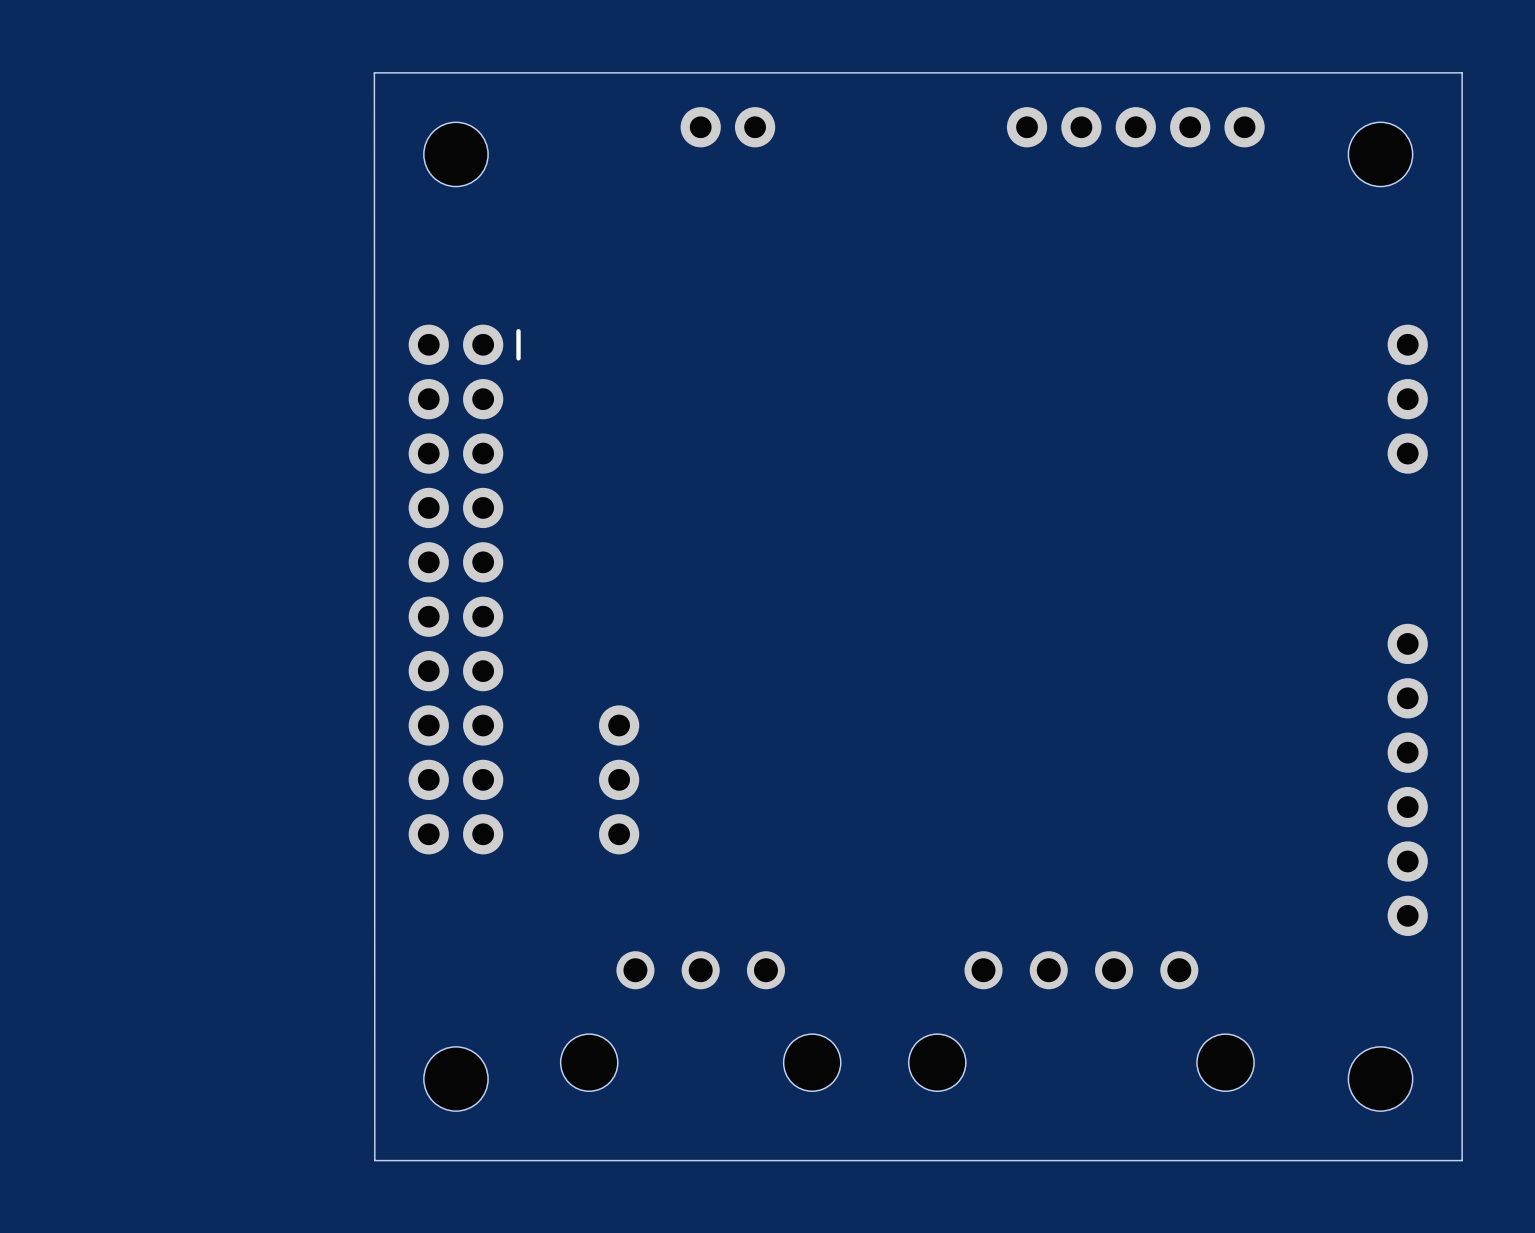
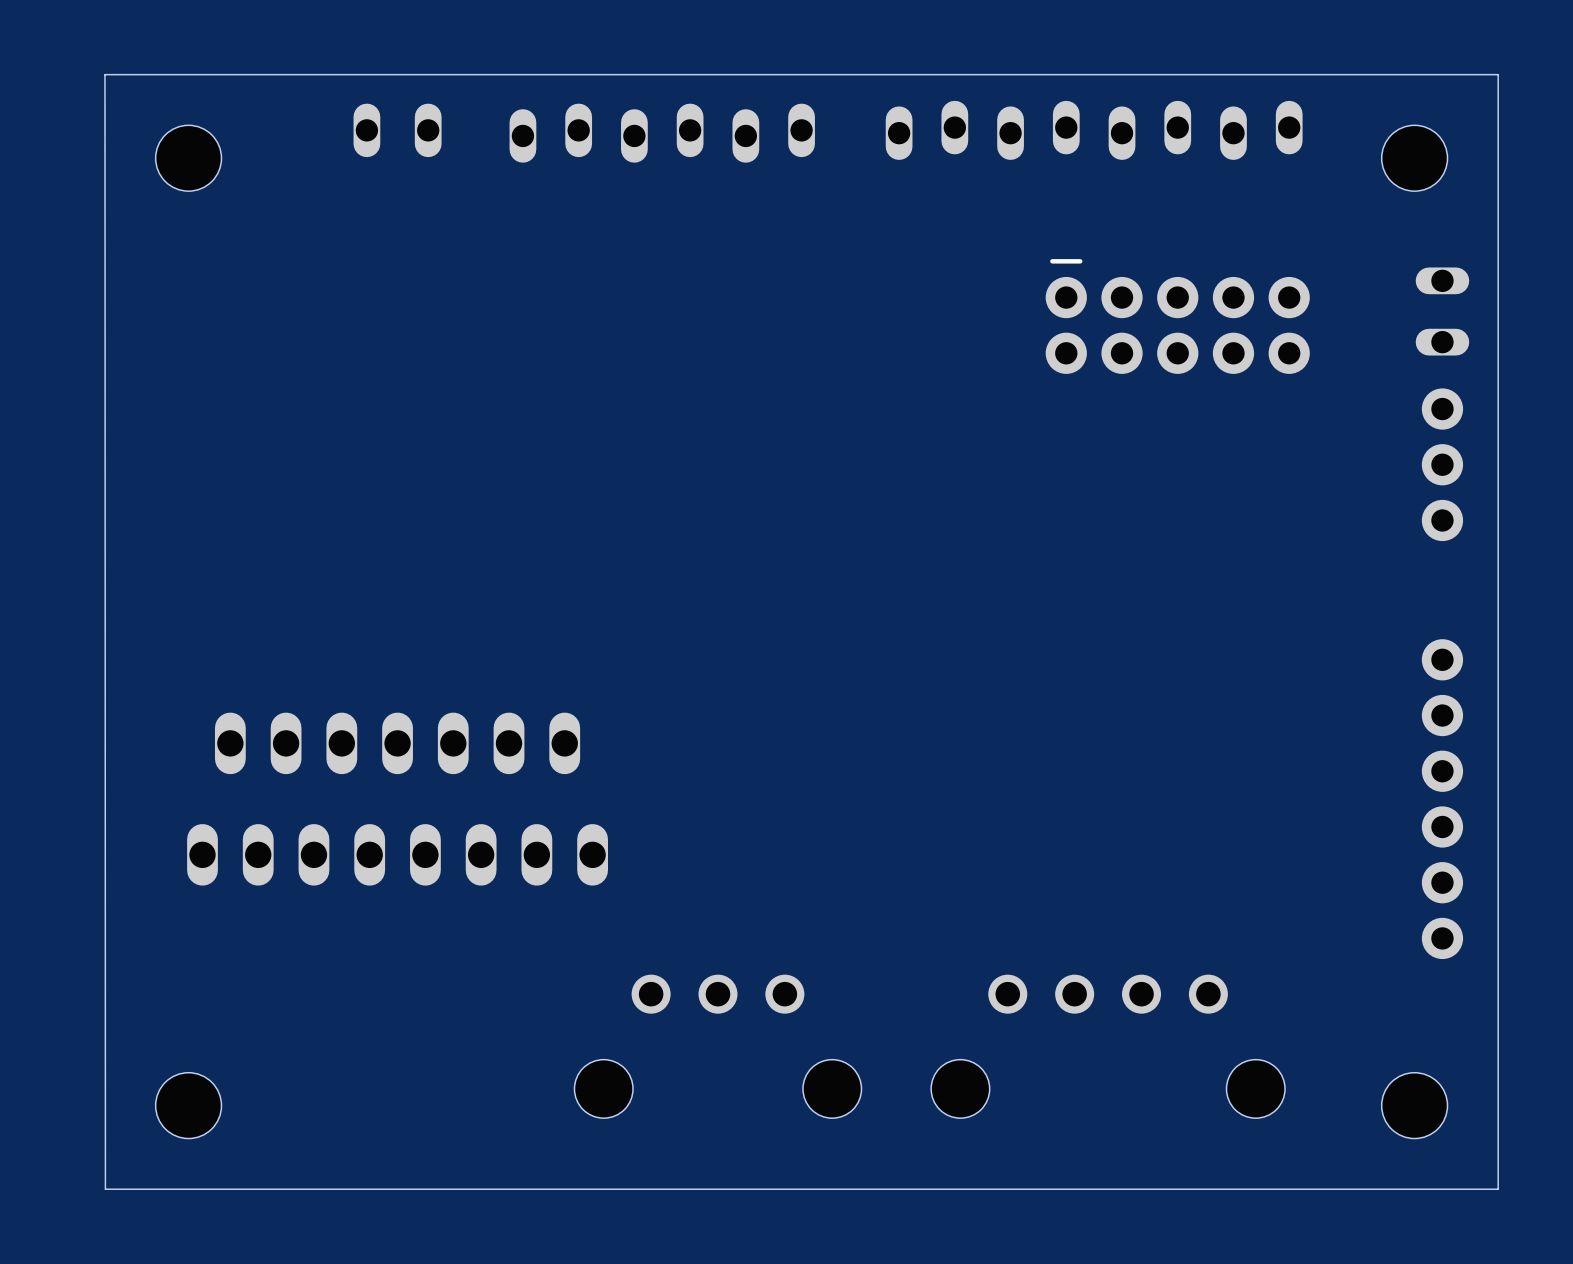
board edge: (374, 72) (374, 1160) -> (383, 74) (104, 74) (105, 1189) (384, 1189)
part: none -> (397, 130)
part: (727, 127) -> none
part: none -> (1094, 130)
part: (1135, 127) -> none
part: none -> (662, 133)
part position: (455, 154) -> (188, 158)
part: none -> (1442, 311)
part: none -> (1177, 316)
part position: (1407, 399) -> (1442, 464)
part: (464, 589) -> none
part: none -> (397, 799)
part: (619, 779) -> none
part position: (455, 1079) -> (188, 1105)

